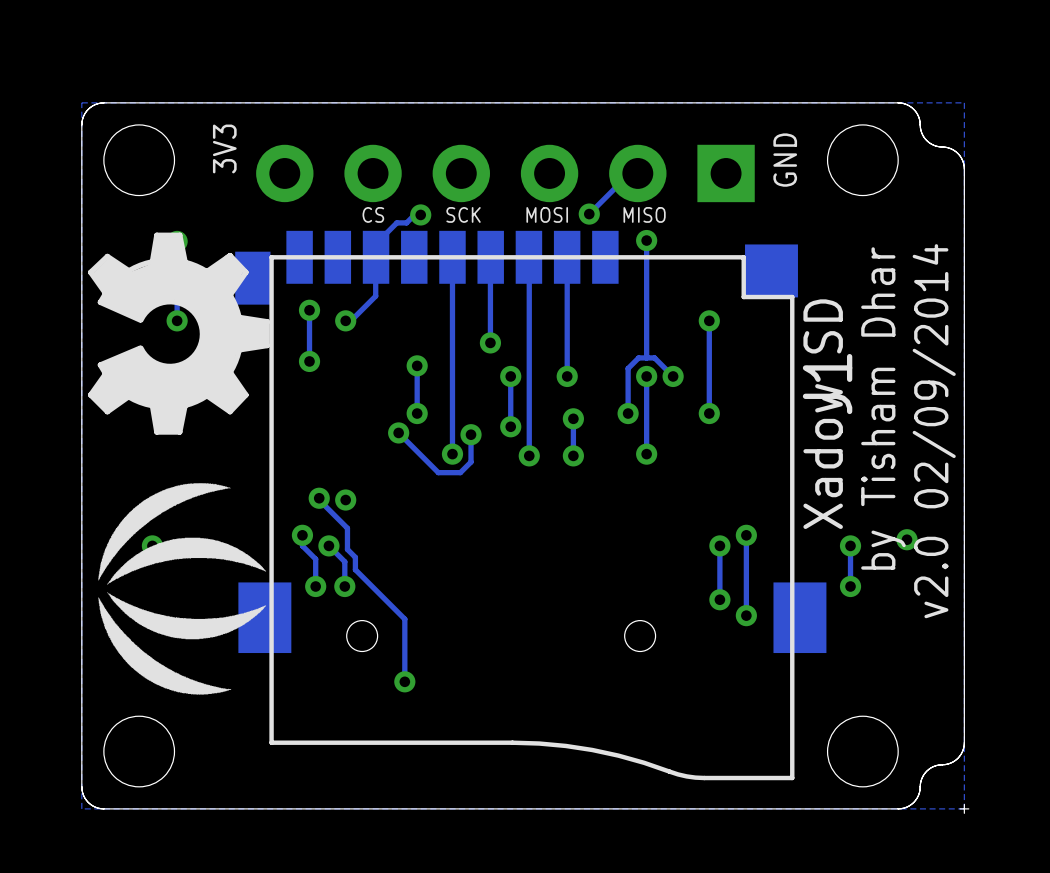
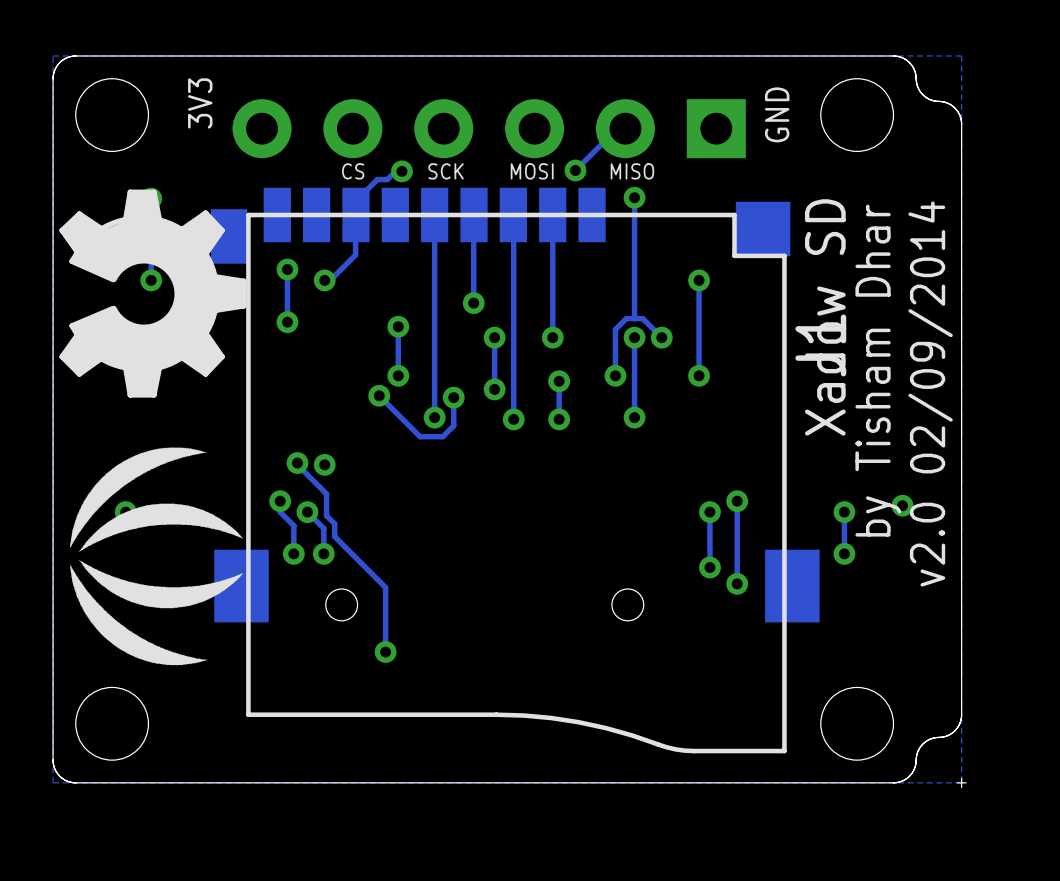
text position: Xadow SD (823, 414) -> Xadow SD (825, 317)

